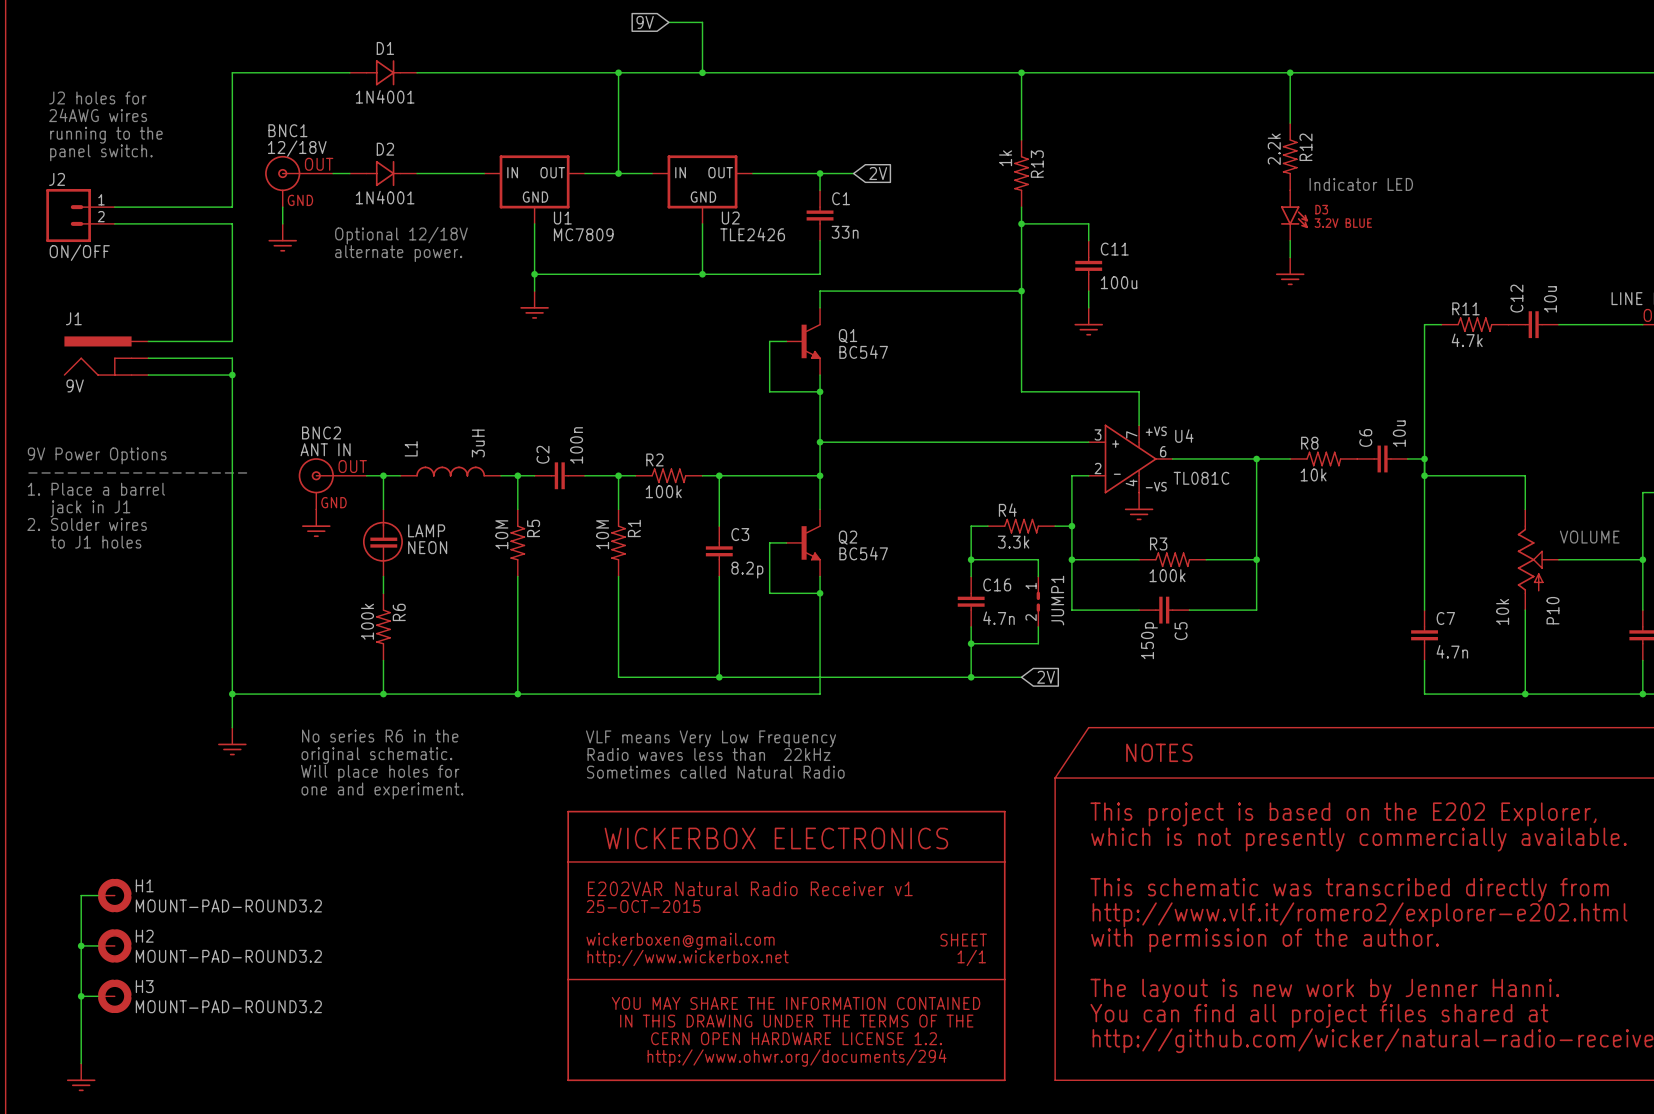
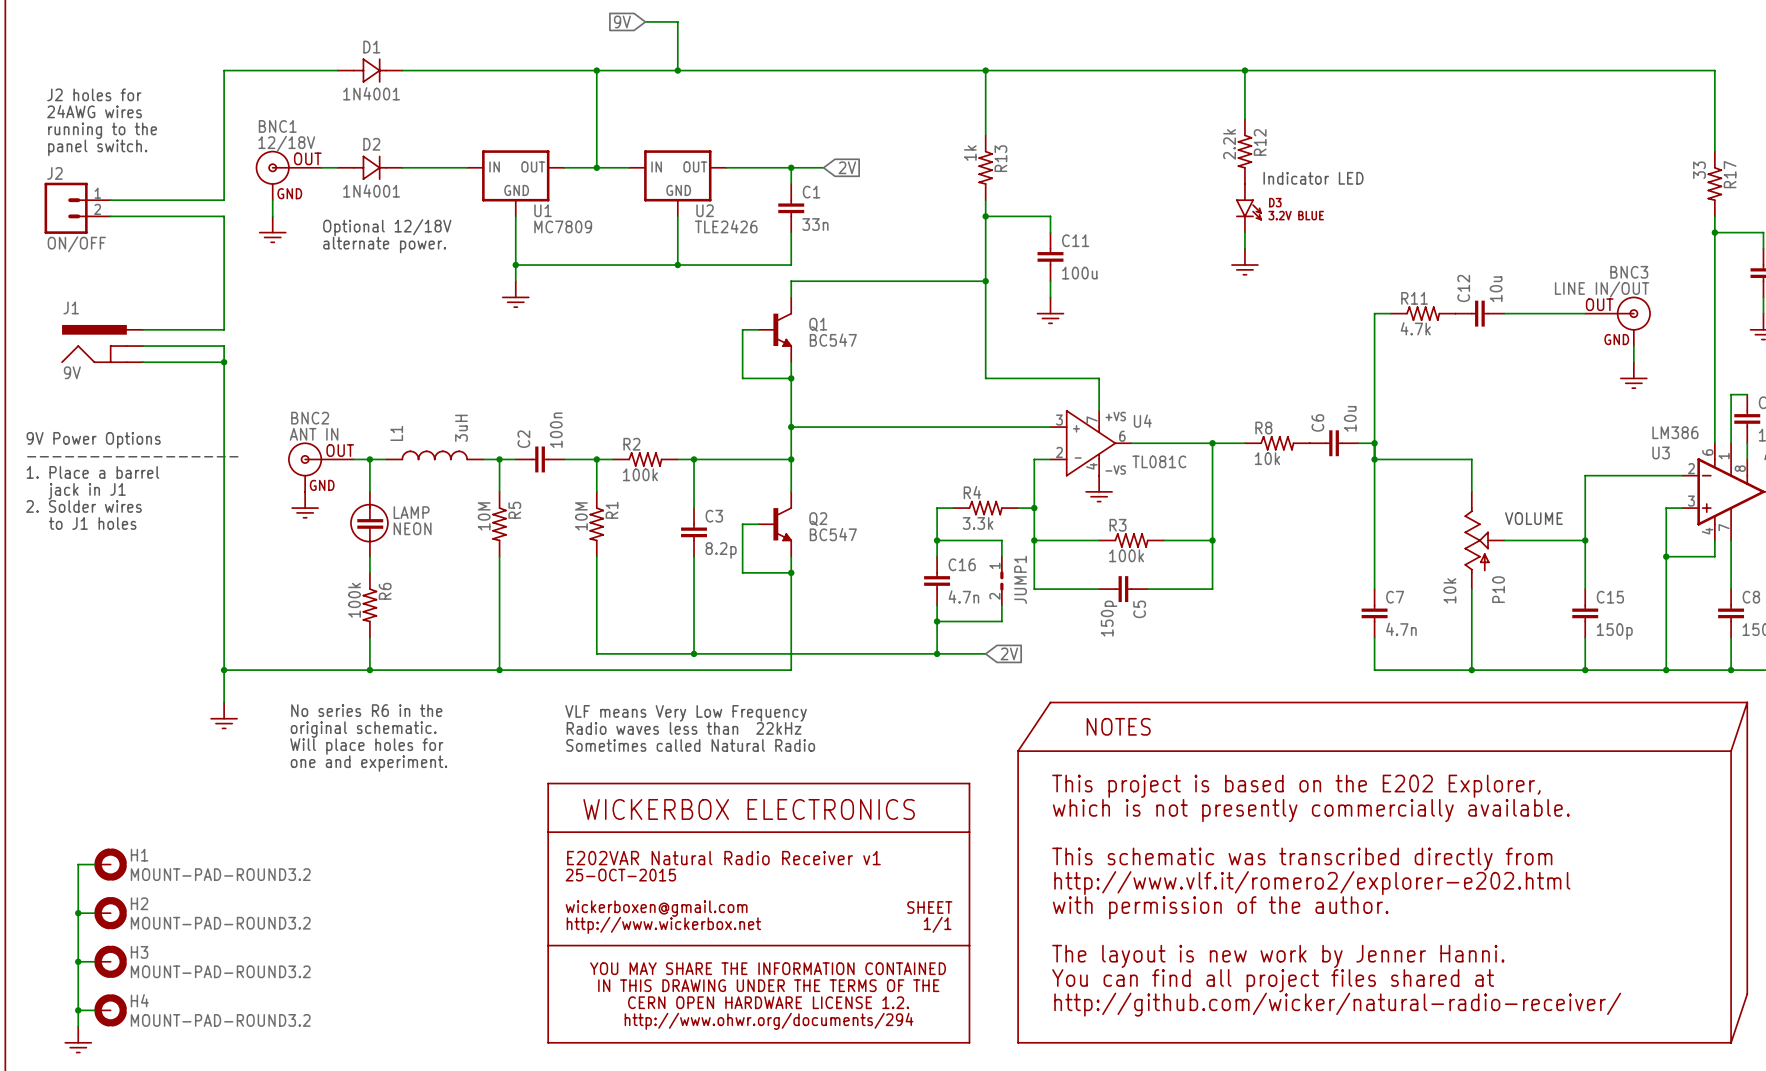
wire: none -> (78, 1010) (94, 1010)
junction: none -> (78, 1010)
H4: none -> MOUNT-PAD-ROUND3.2 (110, 1010)

